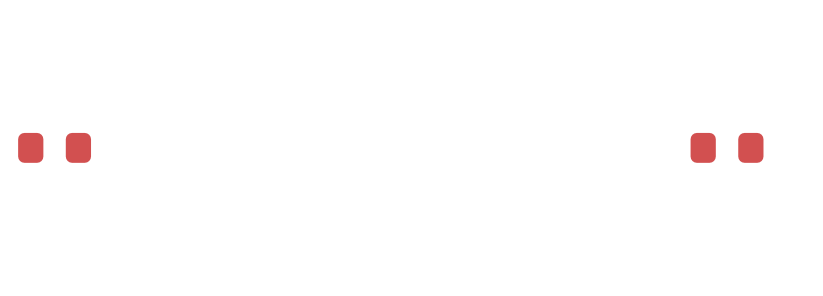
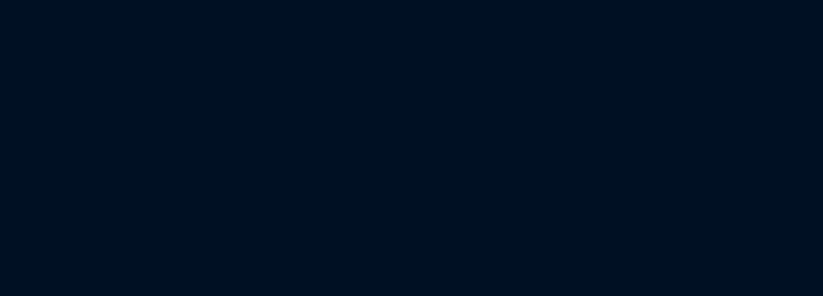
part: (54, 147) -> none
part: (727, 147) -> none

